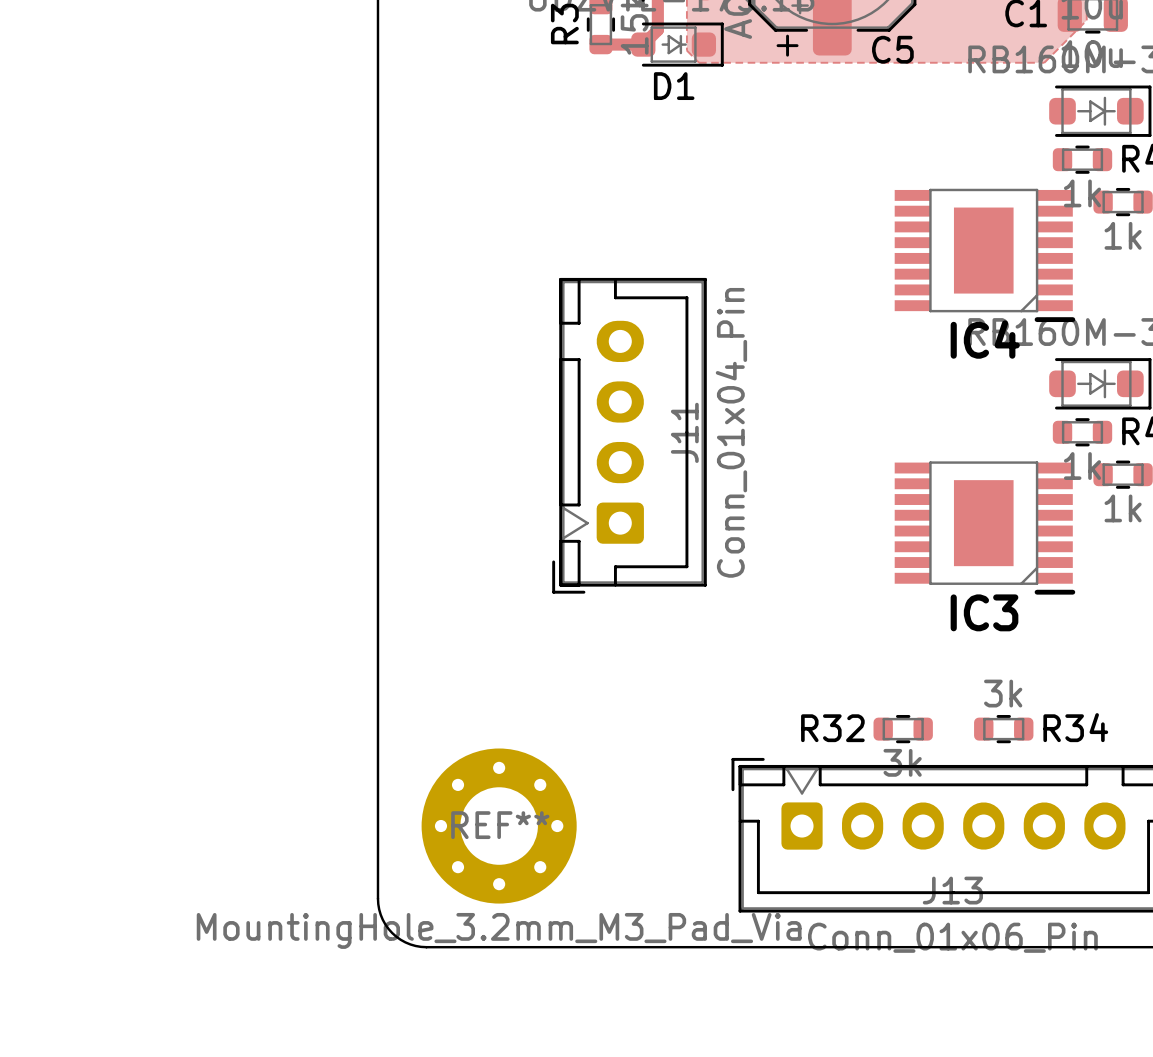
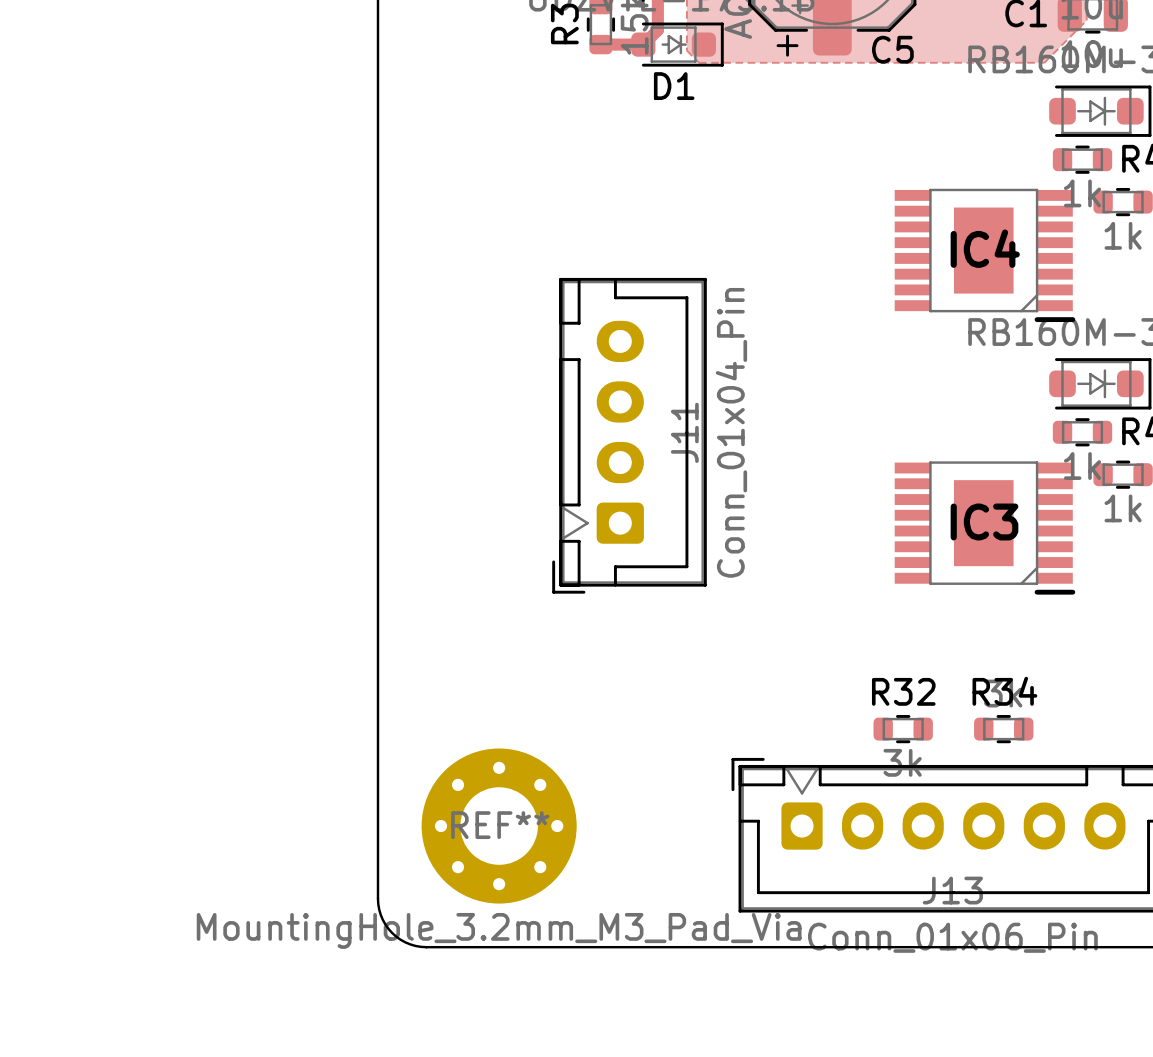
IC4 name position: IC4 (985, 339) -> IC4 (985, 248)
IC3 name position: IC3 (984, 612) -> IC3 (984, 521)
R34 name position: R34 (1075, 727) -> R34 (1004, 691)
R32 name position: R32 (832, 728) -> R32 (903, 691)

